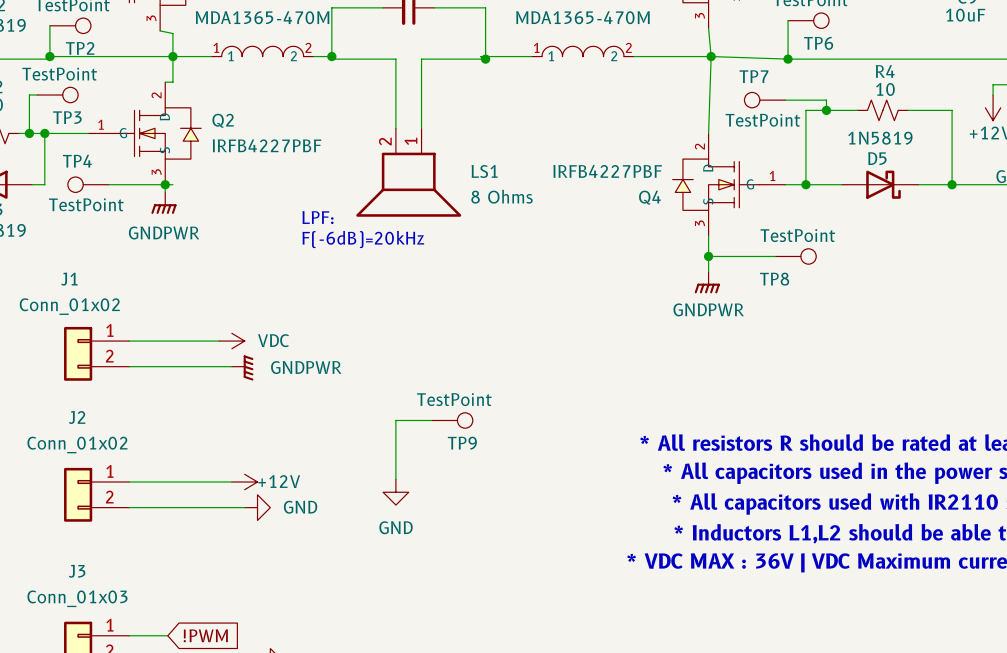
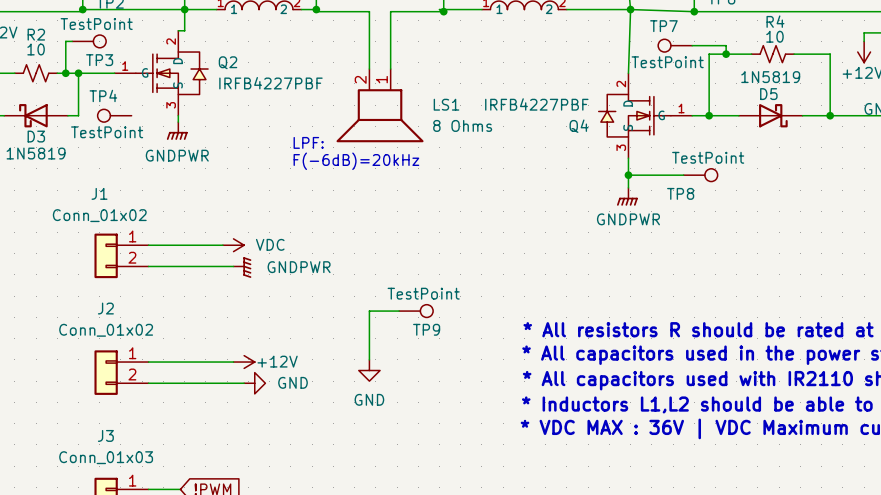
wire: (108, 184) (172, 184) -> none
junction: (165, 184) -> none

